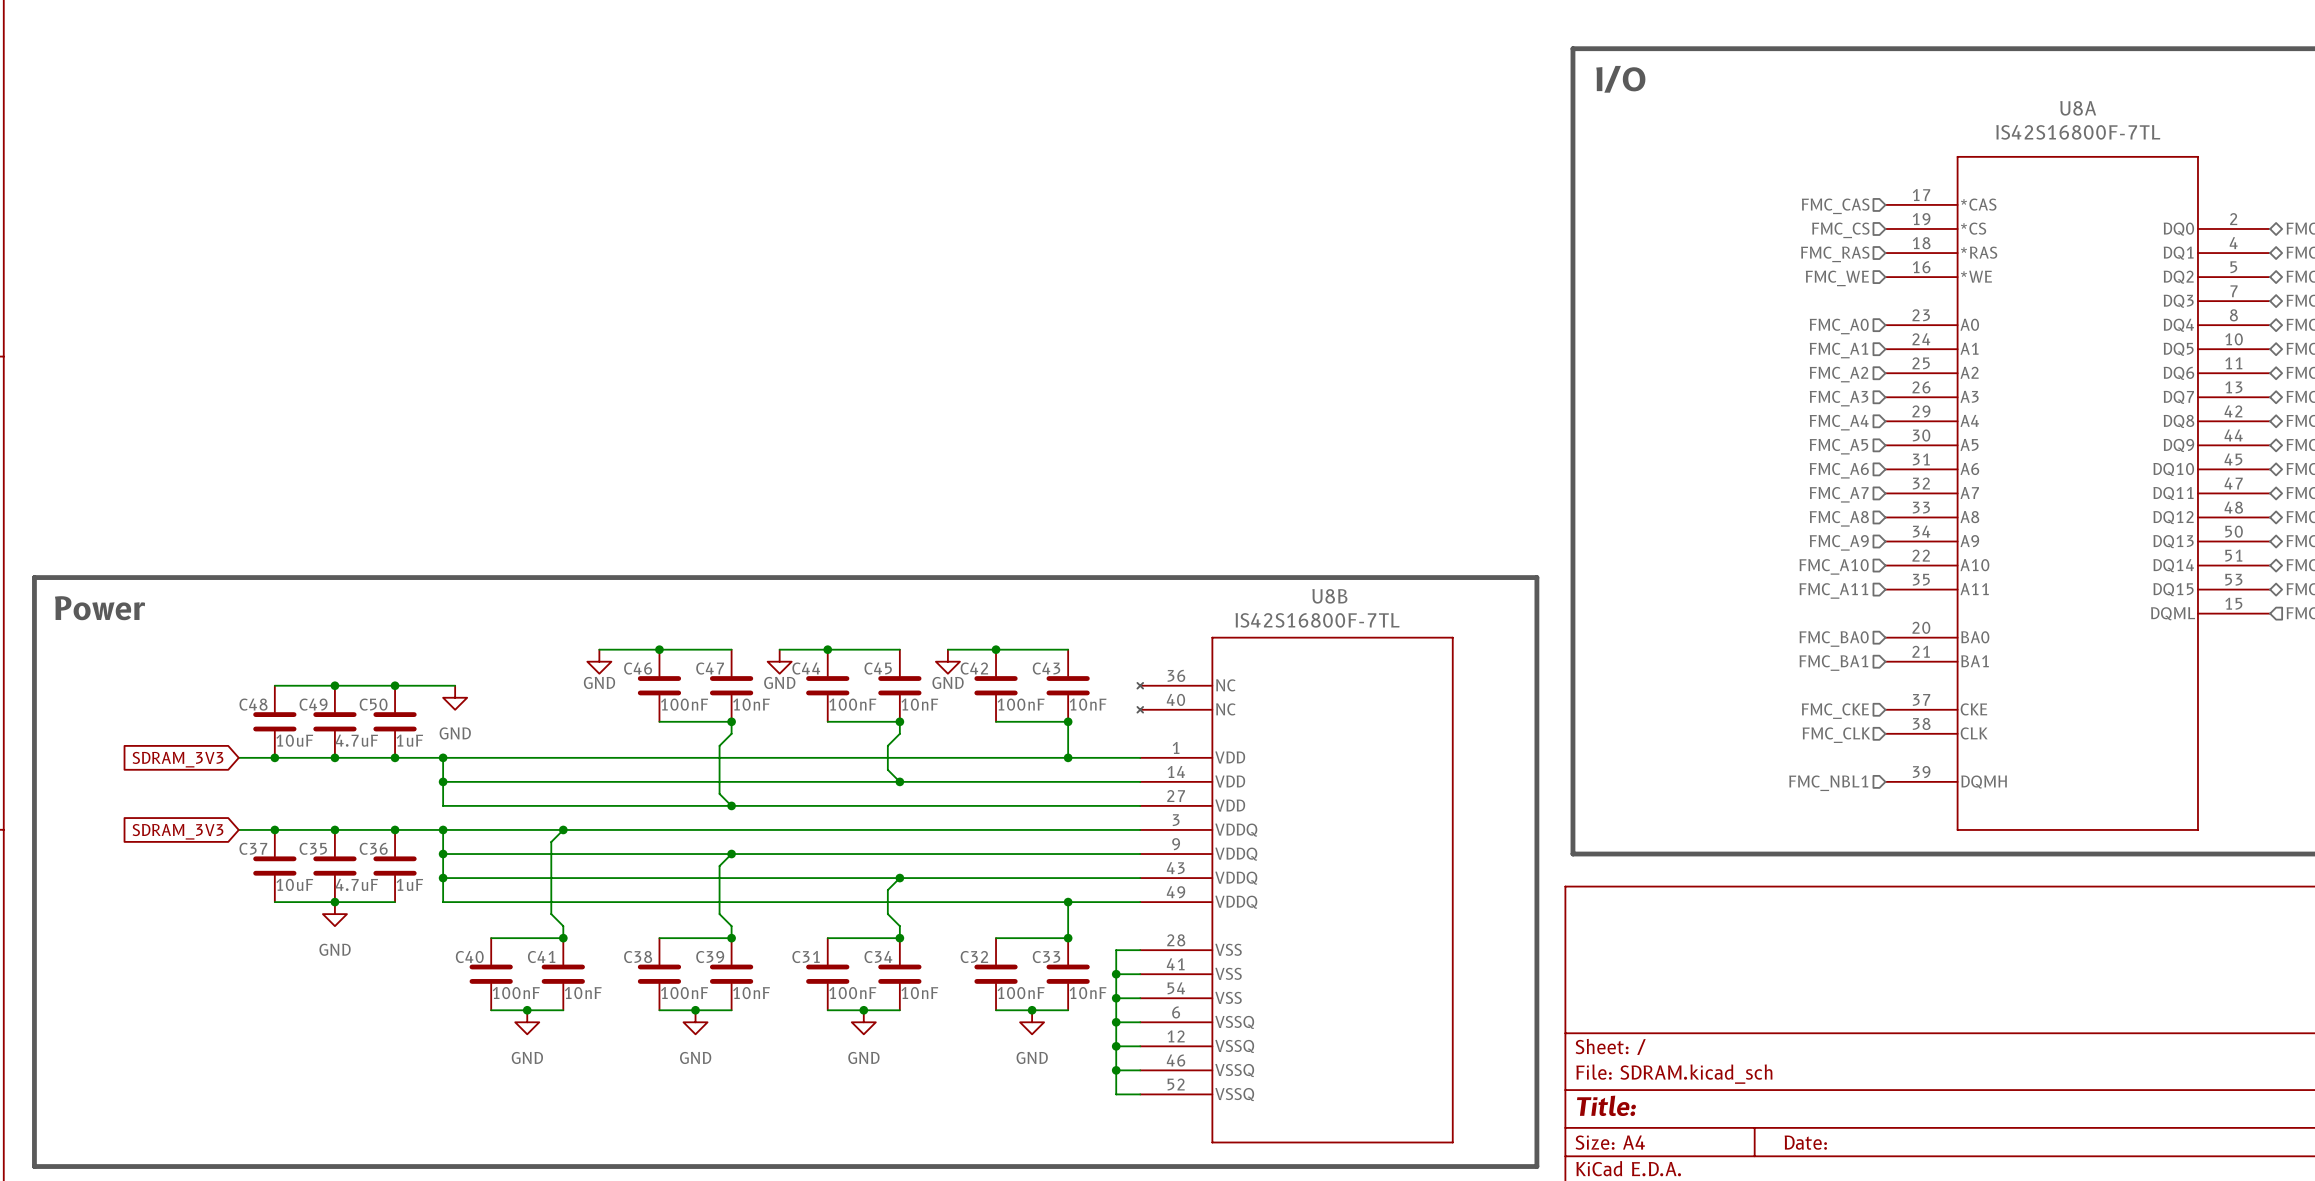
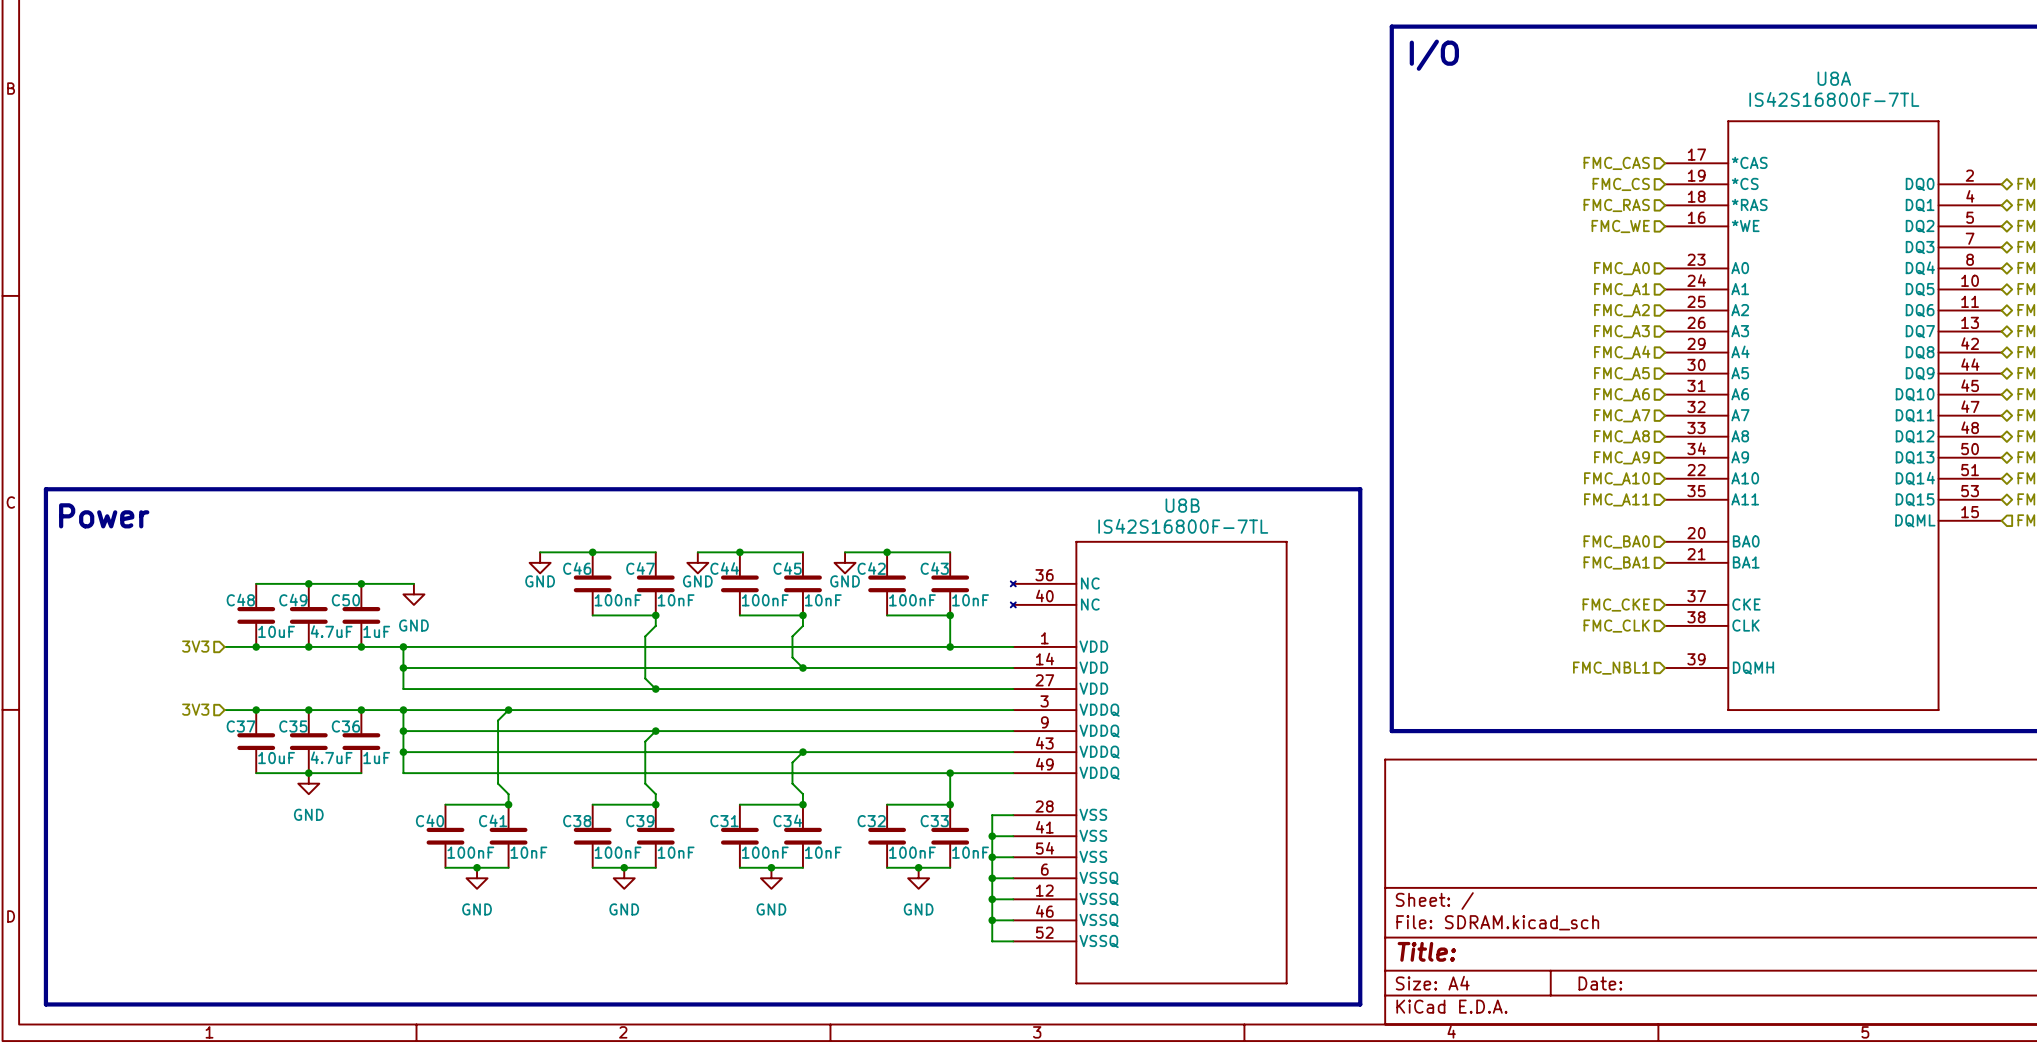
hierarchical label: none -> 3V3 (195, 646)
global label: SDRAM_3V3 (177, 759) -> none
hierarchical label: none -> 3V3 (195, 709)
global label: SDRAM_3V3 (177, 831) -> none

